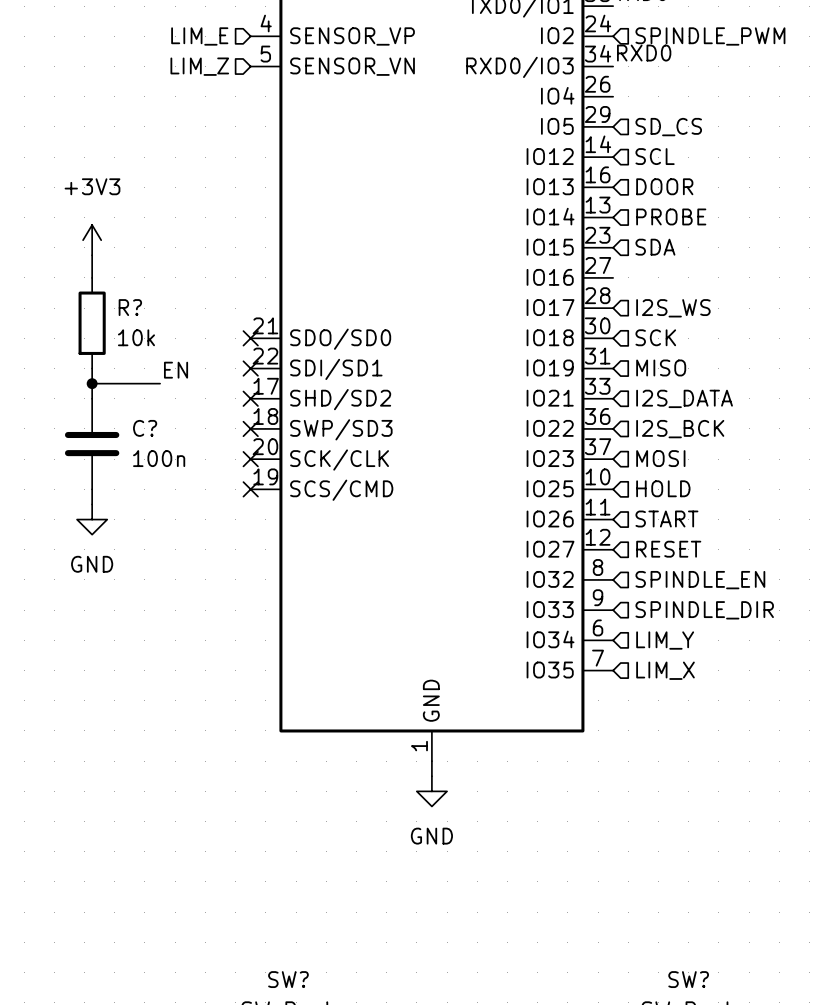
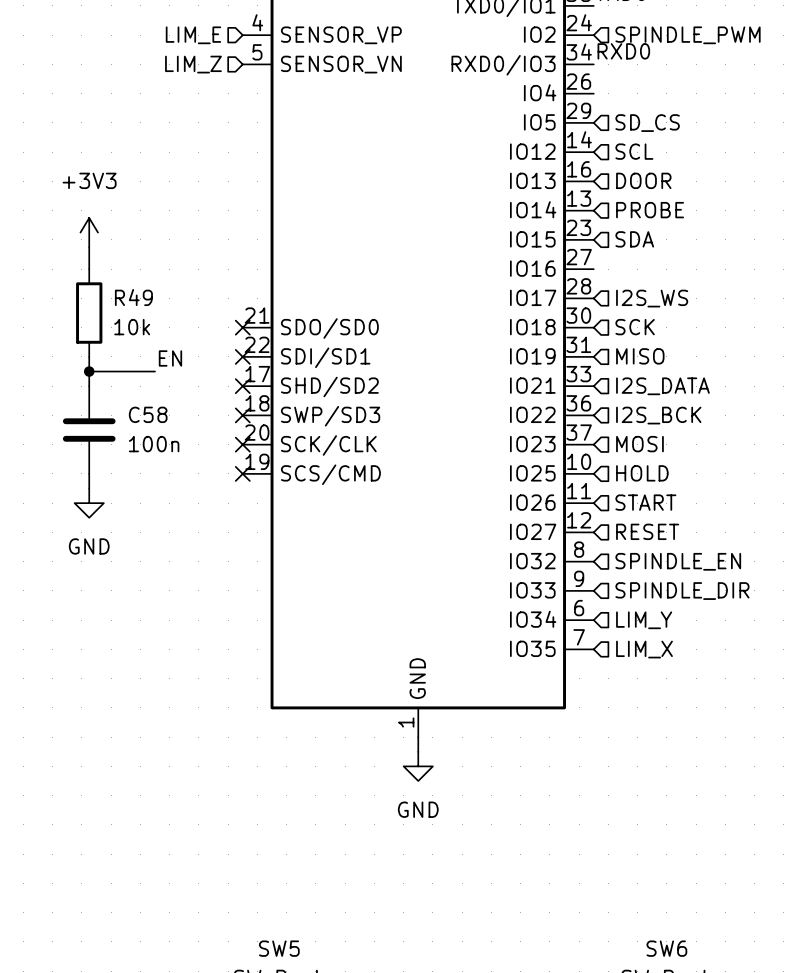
R? name: R? (130, 307) -> R49 (133, 297)
C? name: C? (145, 428) -> C58 (148, 414)
SW? name: SW? (288, 979) -> SW5 (279, 948)
SW? name: SW? (688, 979) -> SW6 (666, 948)

